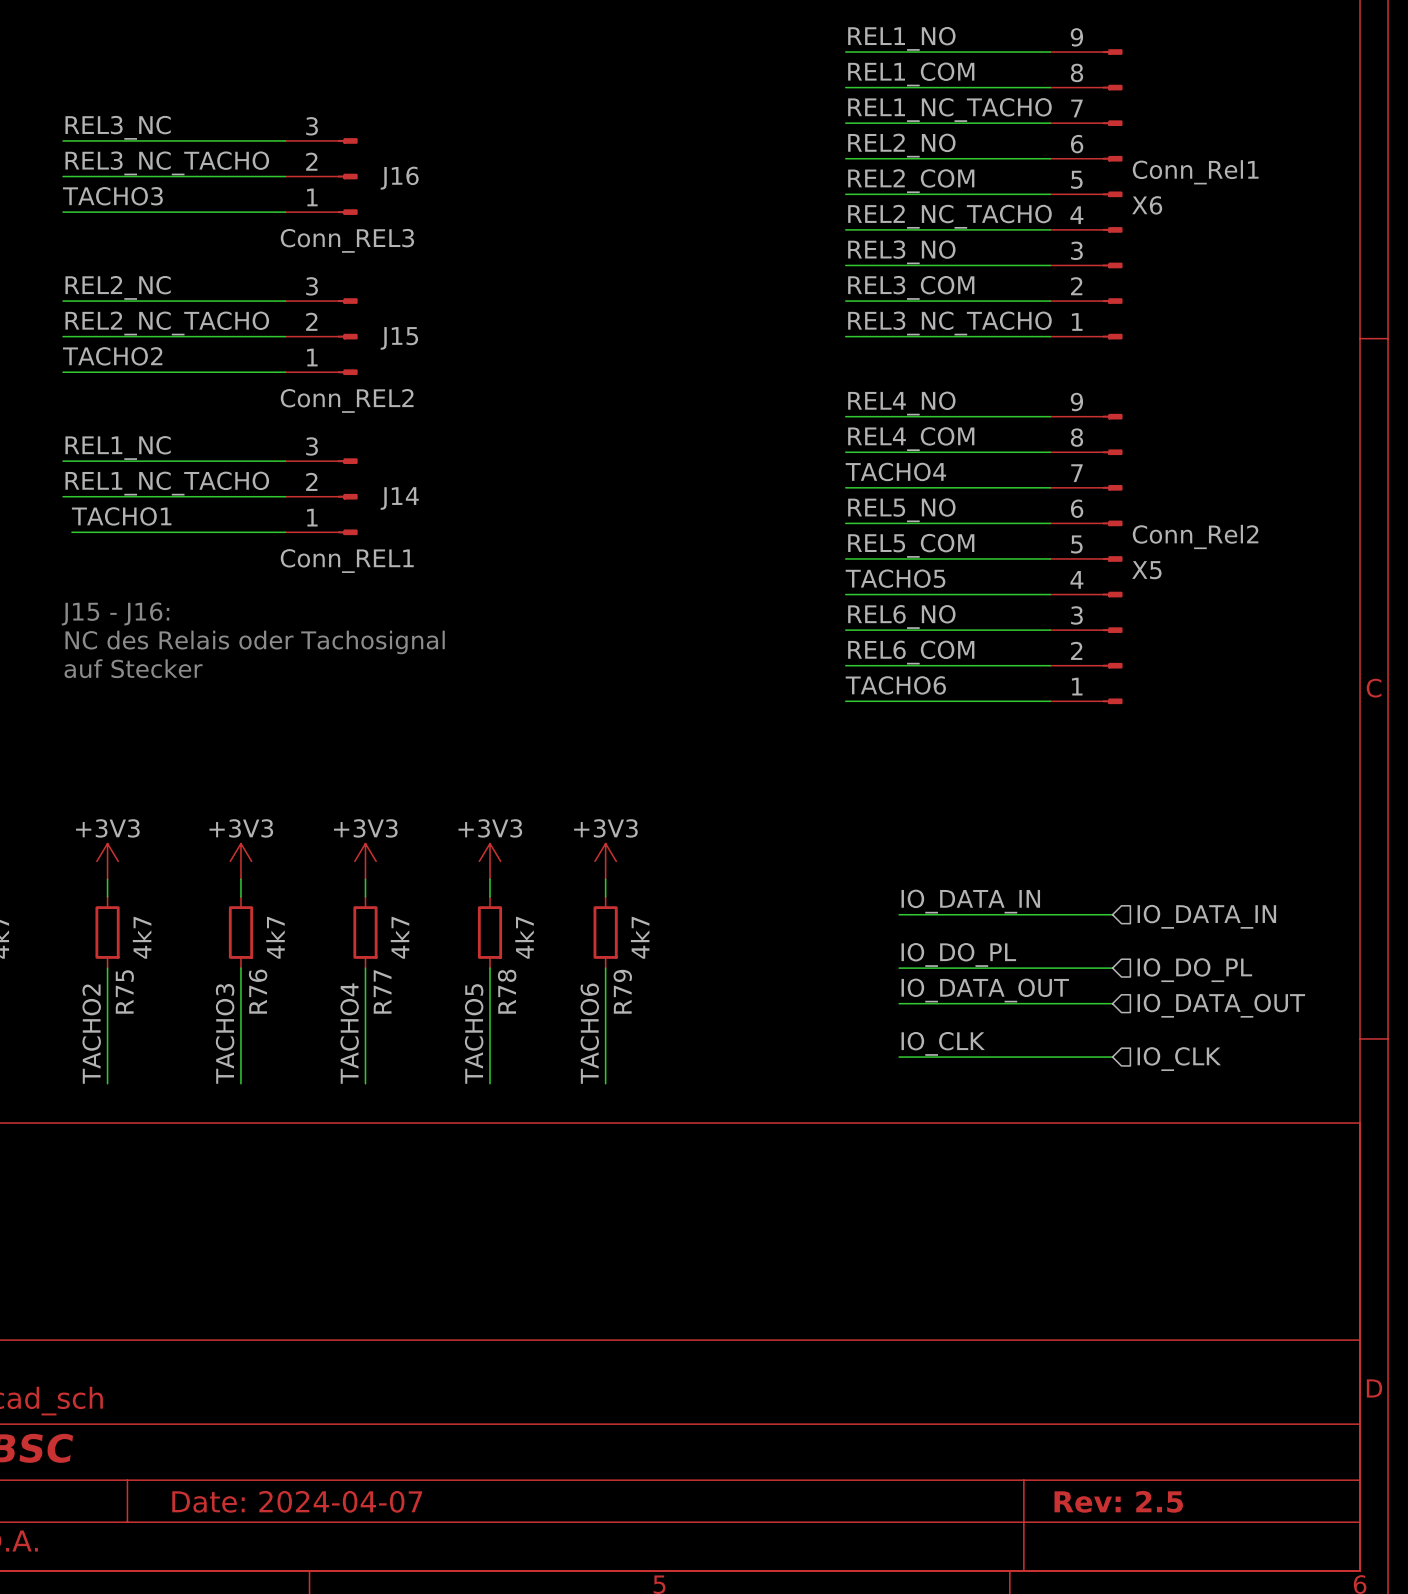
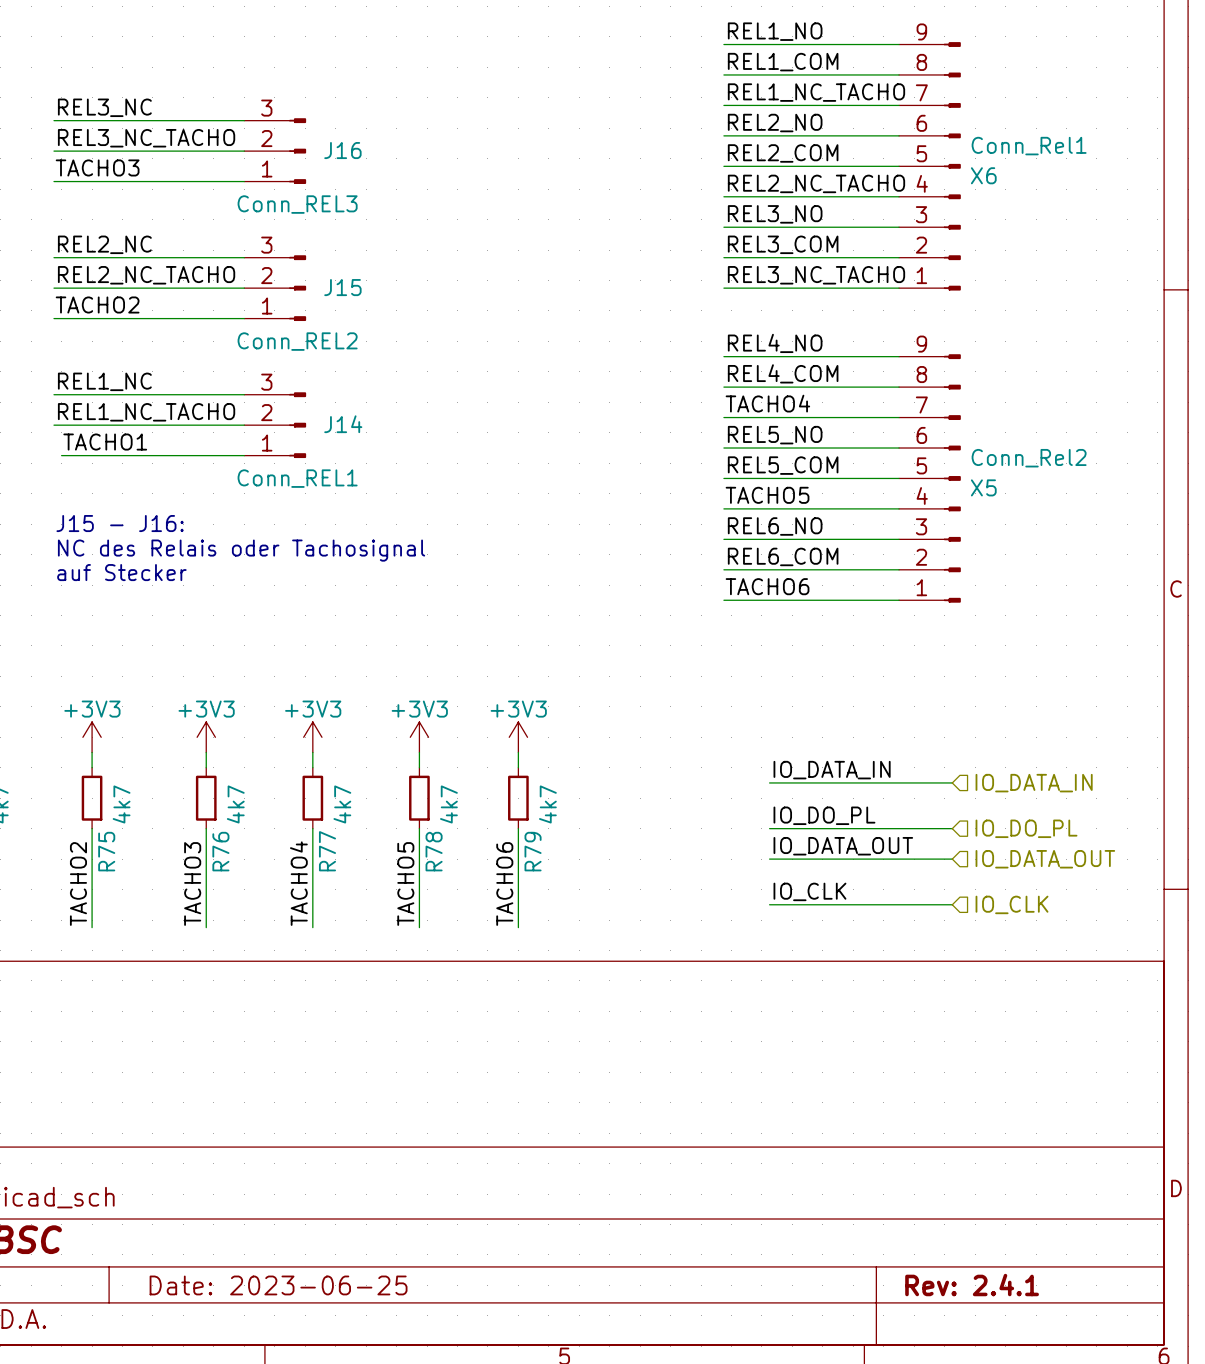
title block: Date: 2024-04-07 (297, 1501) -> Date: 2023-06-25 (278, 1285)
title block: Rev: 2.5 (1118, 1501) -> Rev: 2.4.1 (972, 1285)

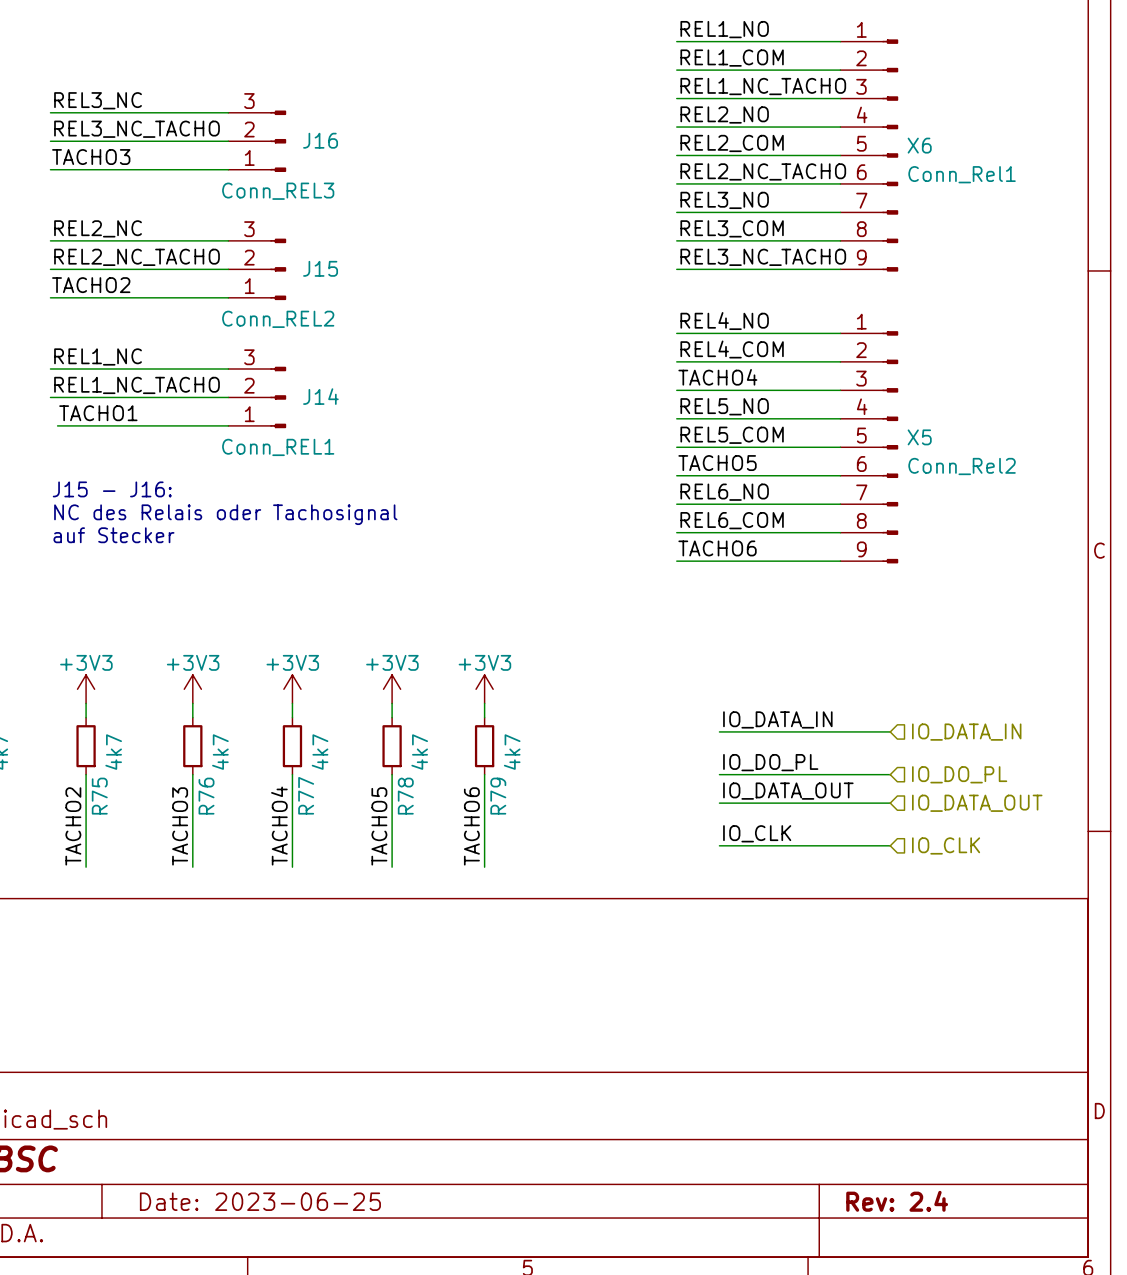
X6 flip: as is (952, 166) -> up-down (890, 155)
X5 flip: as is (952, 478) -> up-down (890, 447)
title block: Rev: 2.4.1 (972, 1285) -> Rev: 2.4 (897, 1201)

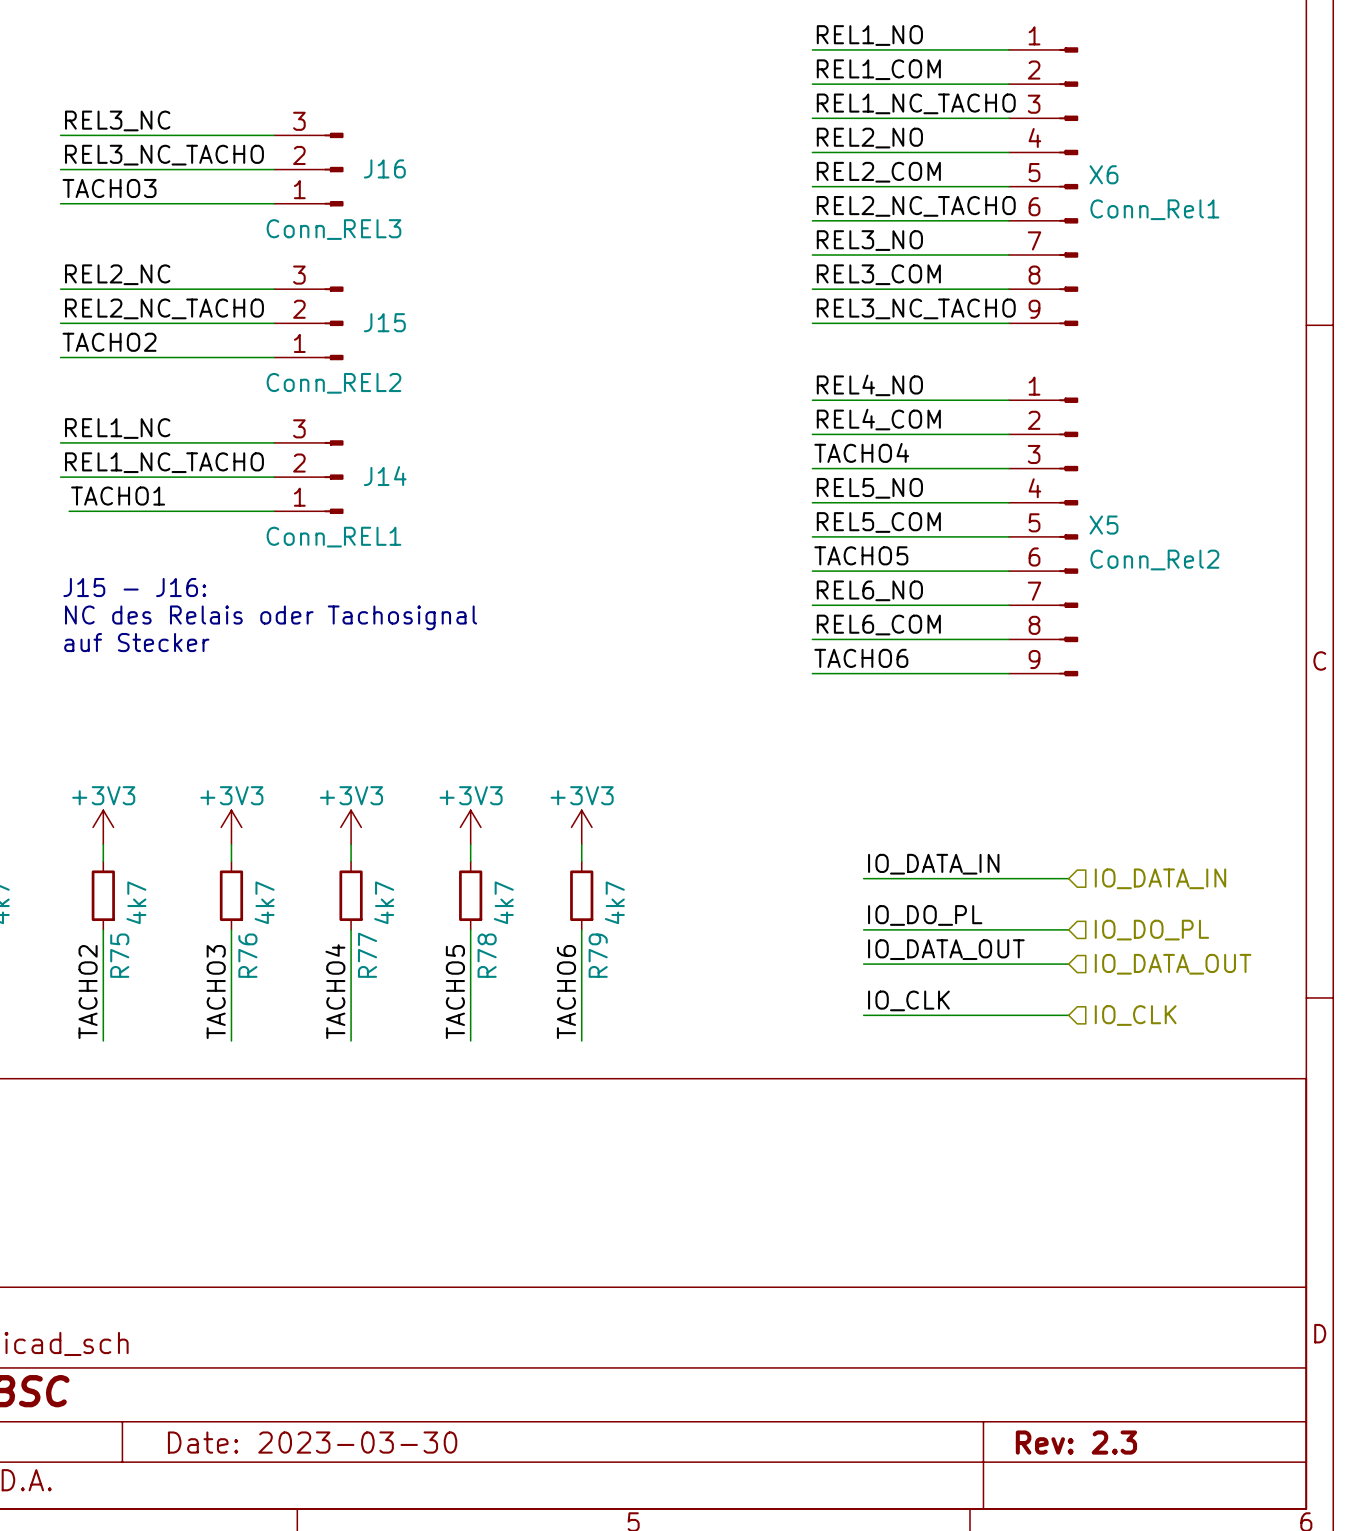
title block: Date: 2023-06-25 (260, 1201) -> Date: 2023-03-30 (312, 1442)
title block: Rev: 2.4 (897, 1201) -> Rev: 2.3 (1076, 1442)

